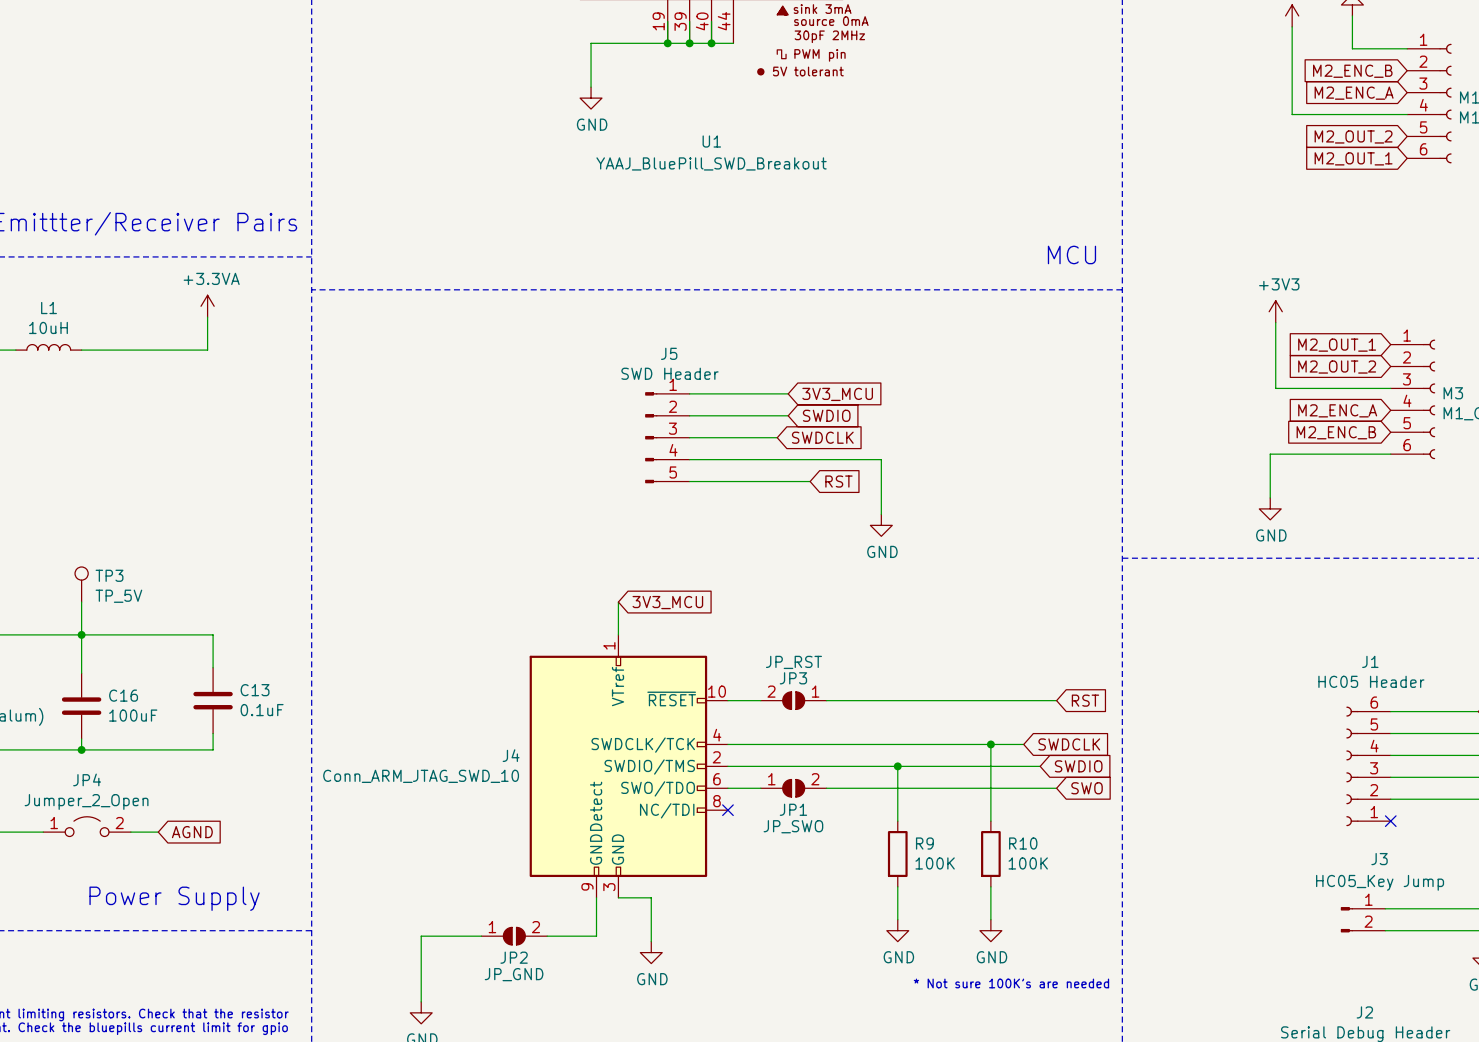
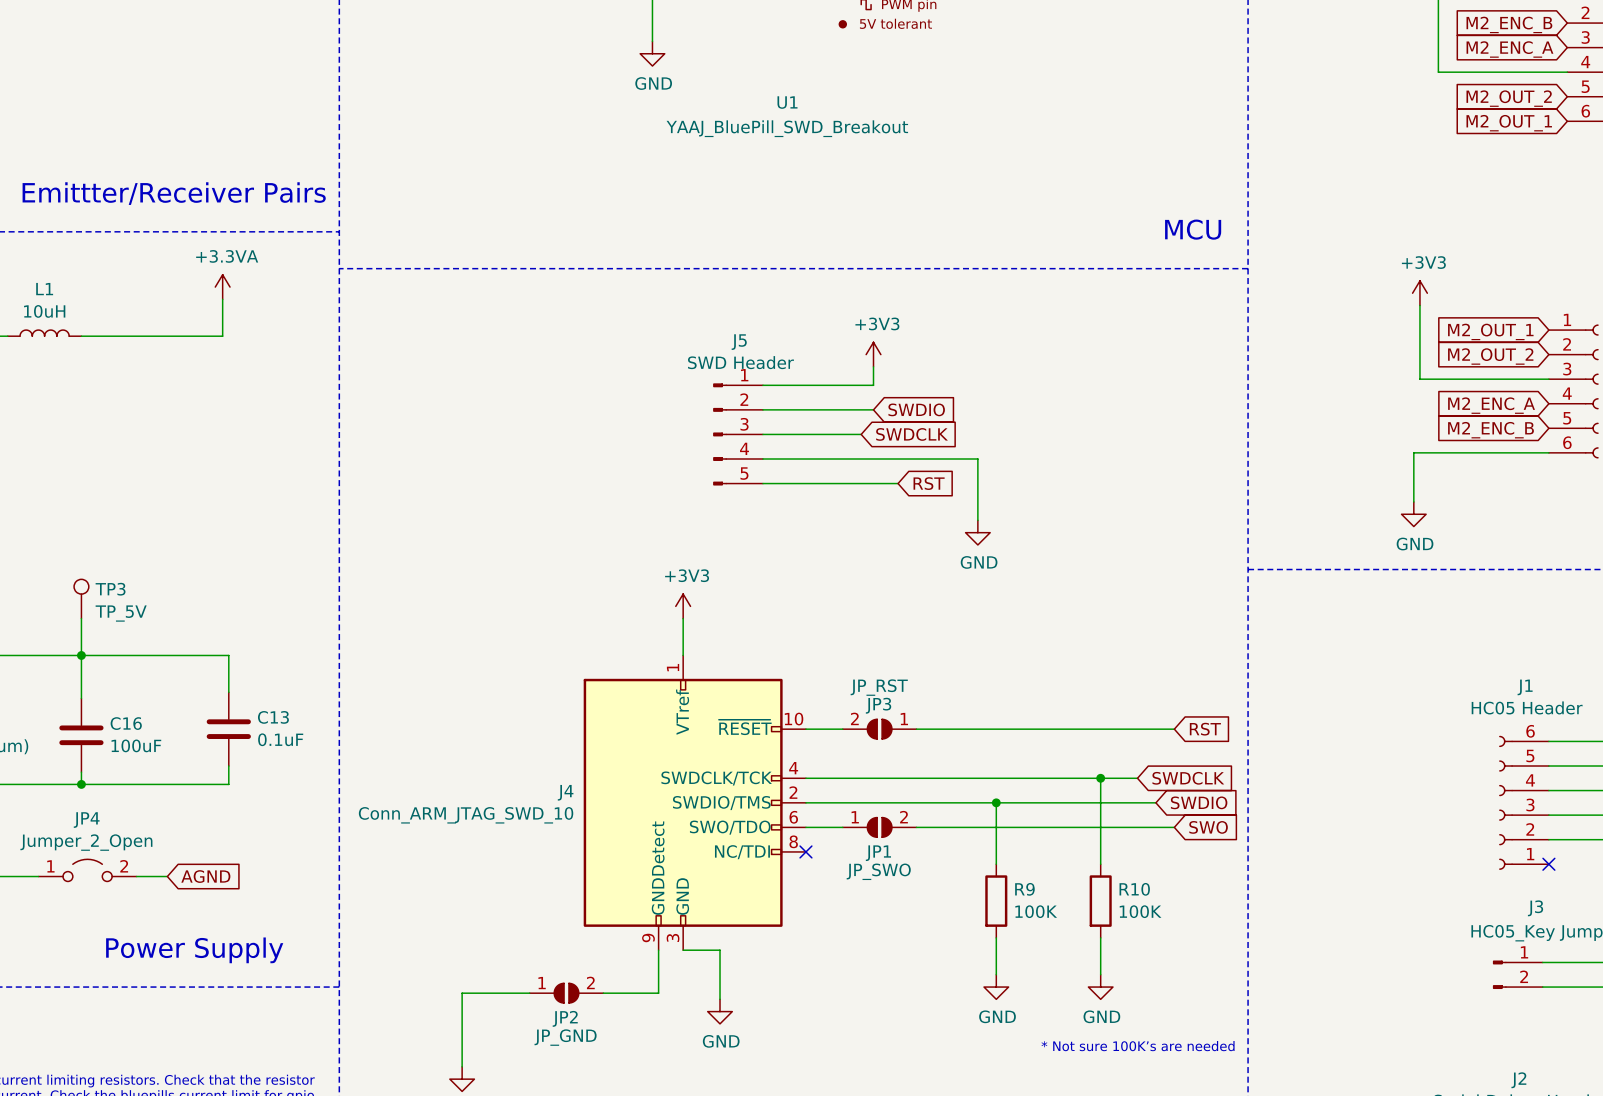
power symbol: none -> +3V3 (873, 354)
wire: none -> (873, 366) (873, 385)
global label: 3V3_MCU (837, 394) -> none
power symbol: none -> +3V3 (683, 606)
global label: 3V3_MCU (667, 602) -> none

